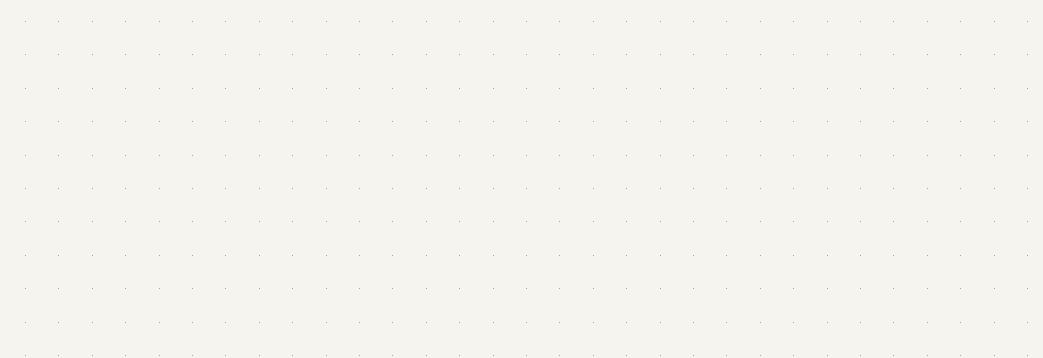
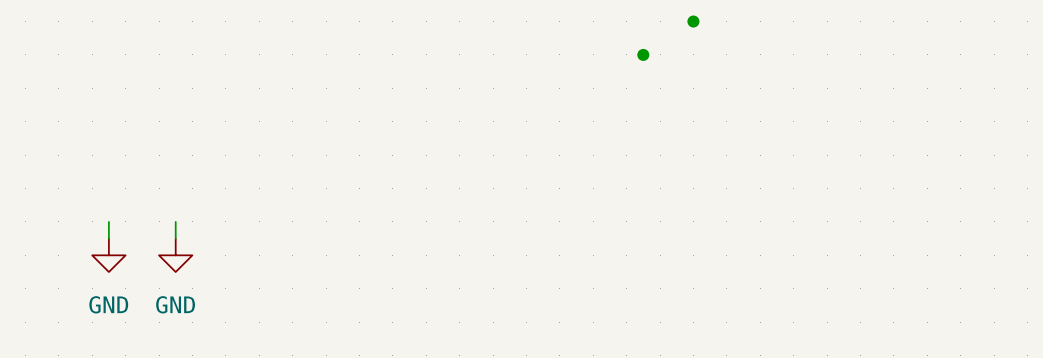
junction: none -> (693, 21)
junction: none -> (643, 54)
wire: none -> (108, 221) (108, 238)
wire: none -> (175, 221) (175, 238)
power symbol: none -> GND (108, 255)
power symbol: none -> GND (175, 255)

